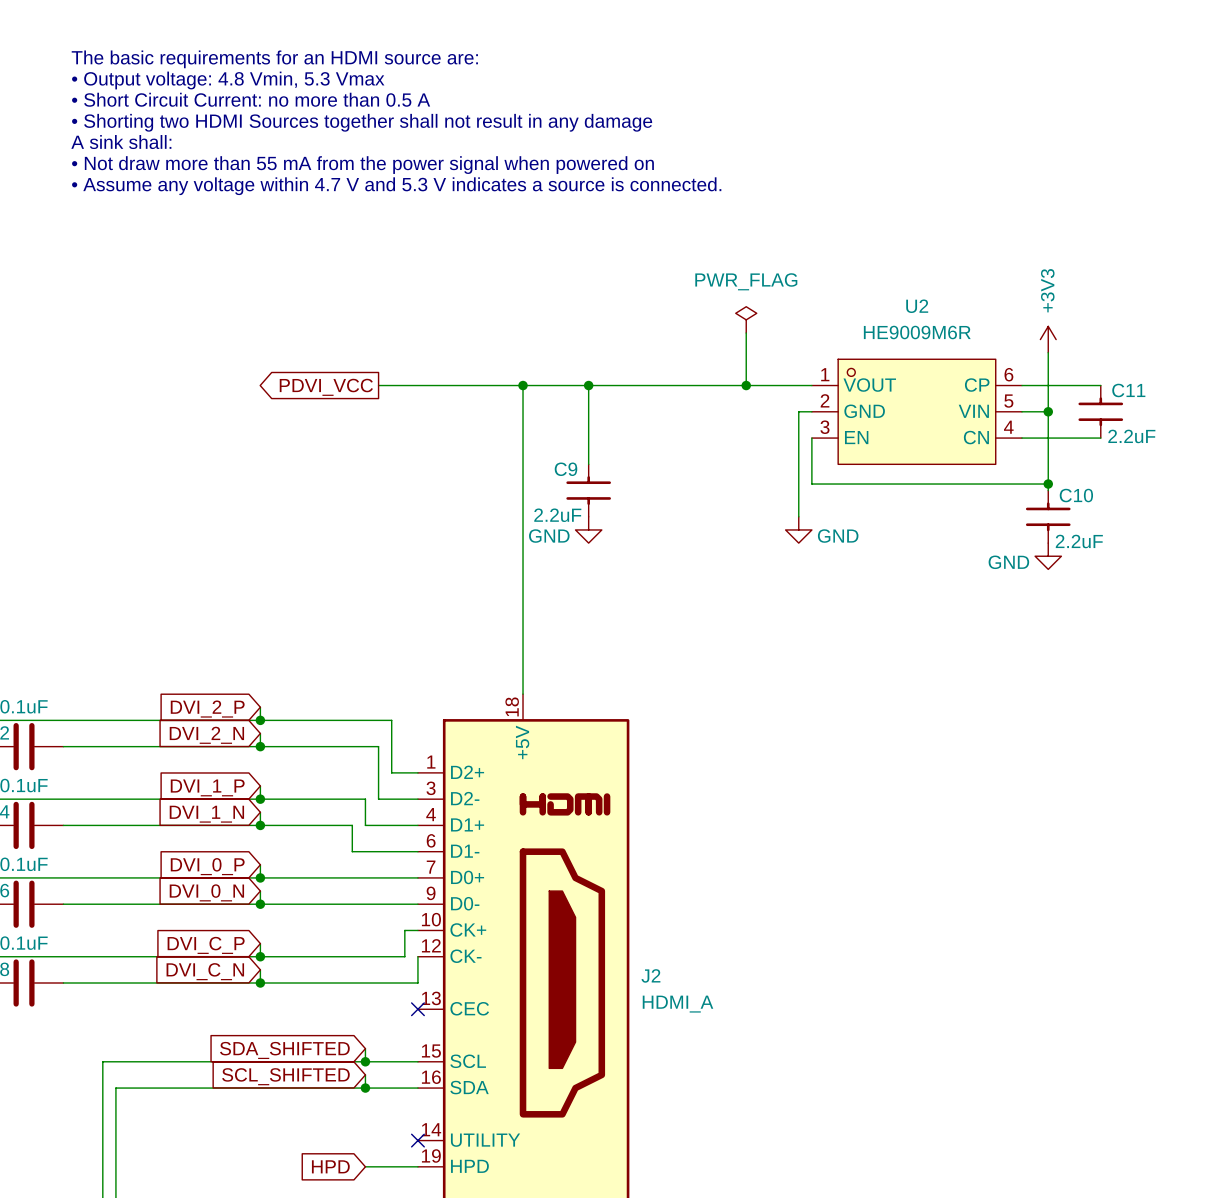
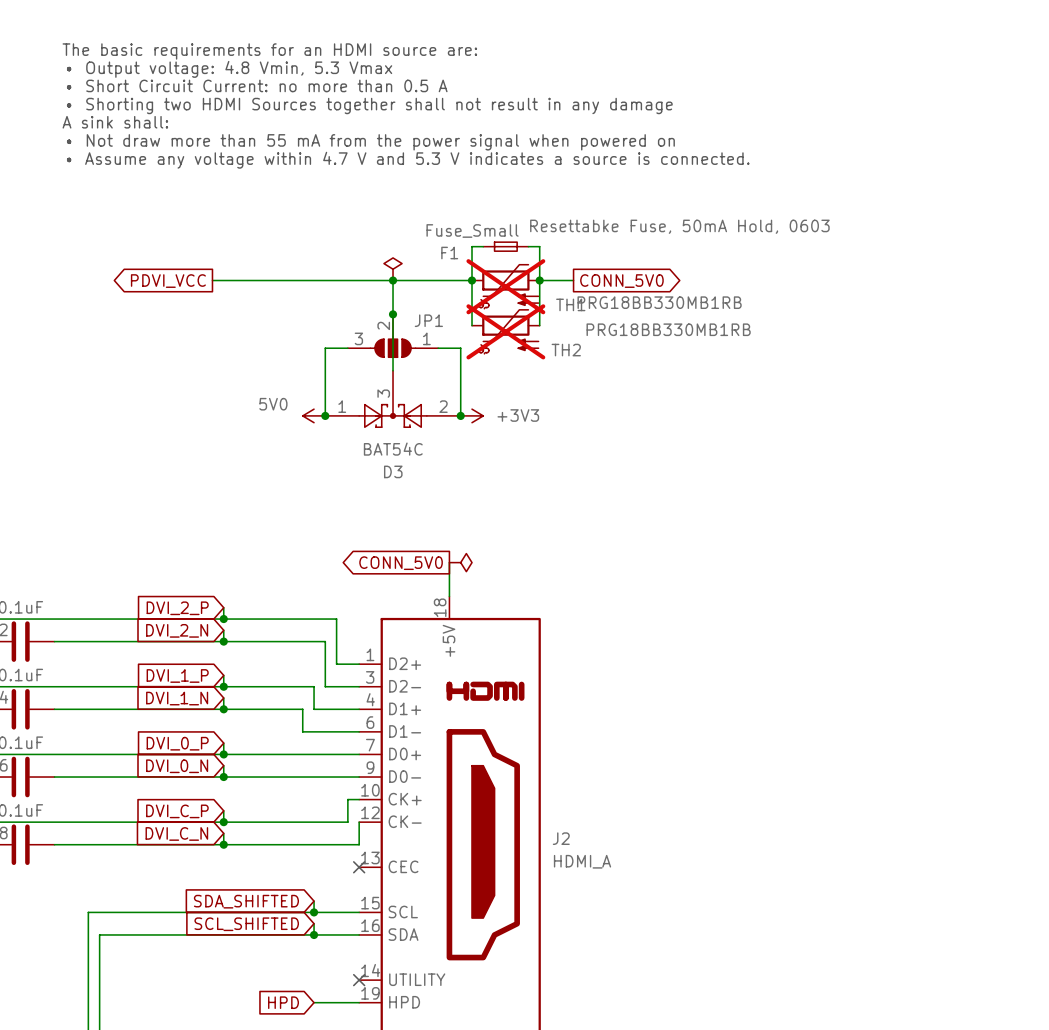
wire: none -> (483, 246) (472, 246) (472, 325)
F1: none -> Fuse_Small (505, 246)
wire: none -> (528, 246) (539, 246) (539, 325)
power symbol: none -> (393, 269)
power symbol: PWR_FLAG (746, 319) -> none
wire: none -> (212, 280) (472, 280)
wire: none -> (393, 280) (393, 370)
junction: none -> (393, 280)
junction: none -> (472, 280)
wire: none -> (539, 280) (573, 280)
junction: none -> (539, 280)
global label: none -> CONN_5V0 (621, 281)
TH1: none -> PRG18BB330MB1RB (505, 286)
wire: (746, 333) (746, 385) -> none
power symbol: +3V3 (1048, 339) -> none
wire: (1048, 352) (1048, 490) -> none
junction: none -> (393, 314)
wire: (378, 385) (811, 385) -> none
wire: (523, 385) (523, 654) -> none
junction: (523, 385) -> none
wire: (588, 385) (588, 464) -> none
junction: (588, 385) -> none
junction: (746, 385) -> none
wire: (1021, 385) (1100, 385) -> none
TH2: none -> PRG18BB330MB1RB (505, 331)
global label position: PDVI_VCC (326, 387) -> PDVI_VCC (168, 281)
JP1: none -> (393, 335)
wire: none -> (347, 348) (325, 348) (325, 415)
wire: none -> (438, 348) (460, 348) (460, 415)
wire: (811, 411) (798, 411) (798, 516) -> none
U2: HE9009M6R (916, 411) -> none
wire: (1021, 411) (1048, 411) -> none
junction: (1048, 411) -> none
C11: 2.2uF (1100, 411) -> none
wire: (811, 438) (811, 484) (1048, 484) -> none
wire: (1021, 438) (1100, 438) -> none
D3: none -> BAT54C (393, 399)
power symbol: none -> 5V0 (314, 415)
junction: none -> (325, 415)
junction: none -> (460, 415)
power symbol: none -> +3V3 (472, 415)
junction: (1048, 484) -> none
C9: 2.2uF (588, 490) -> none
C10: 2.2uF (1048, 516) -> none
power symbol: GND (588, 529) -> none
power symbol: GND (798, 529) -> none
power symbol: GND (1048, 556) -> none
power symbol: none -> (460, 562)
global label: none -> CONN_5V0 (401, 563)

